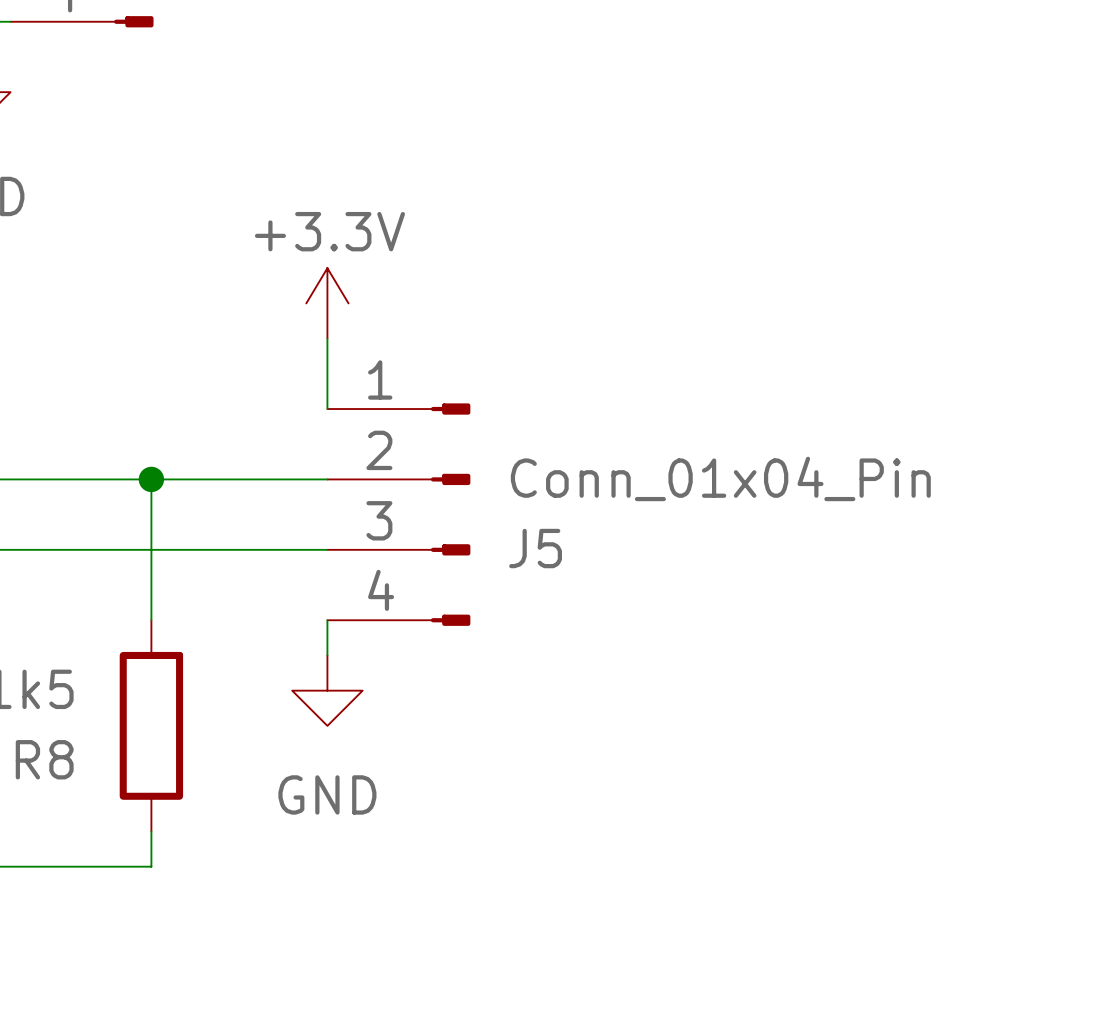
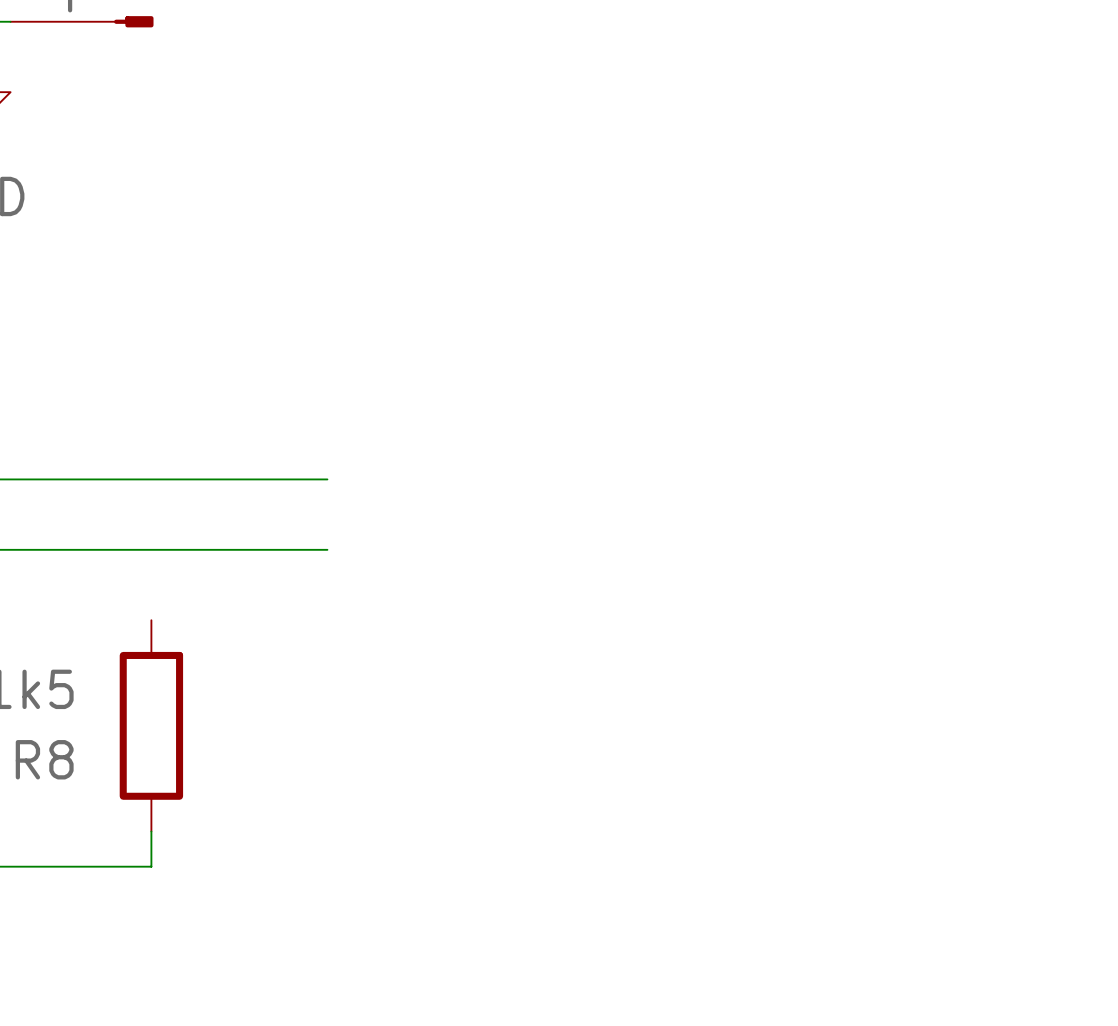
power symbol: +3.3V (327, 303) -> none
wire: (327, 338) (327, 409) -> none
wire: (151, 479) (151, 620) -> none
junction: (151, 479) -> none
J5: Conn_01x04_Pin (398, 514) -> none
wire: (327, 620) (327, 655) -> none
power symbol: GND (327, 690) -> none

